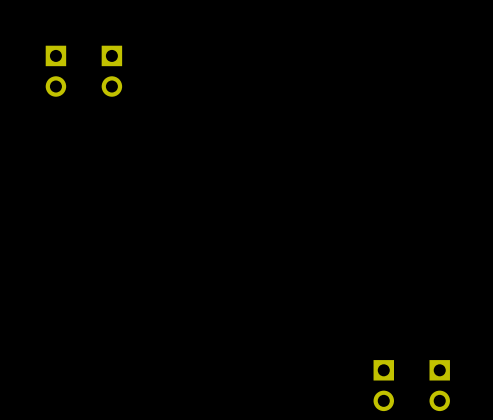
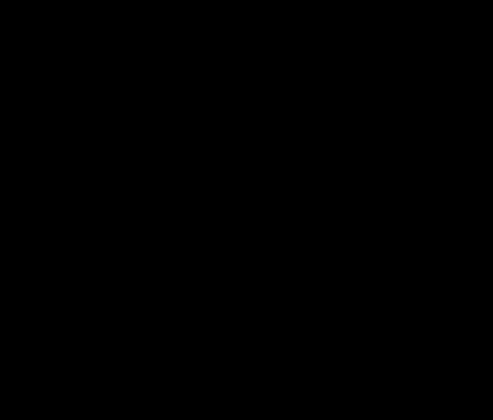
part: (55, 71) -> none
part: (111, 71) -> none
part: (383, 385) -> none
part: (439, 385) -> none

